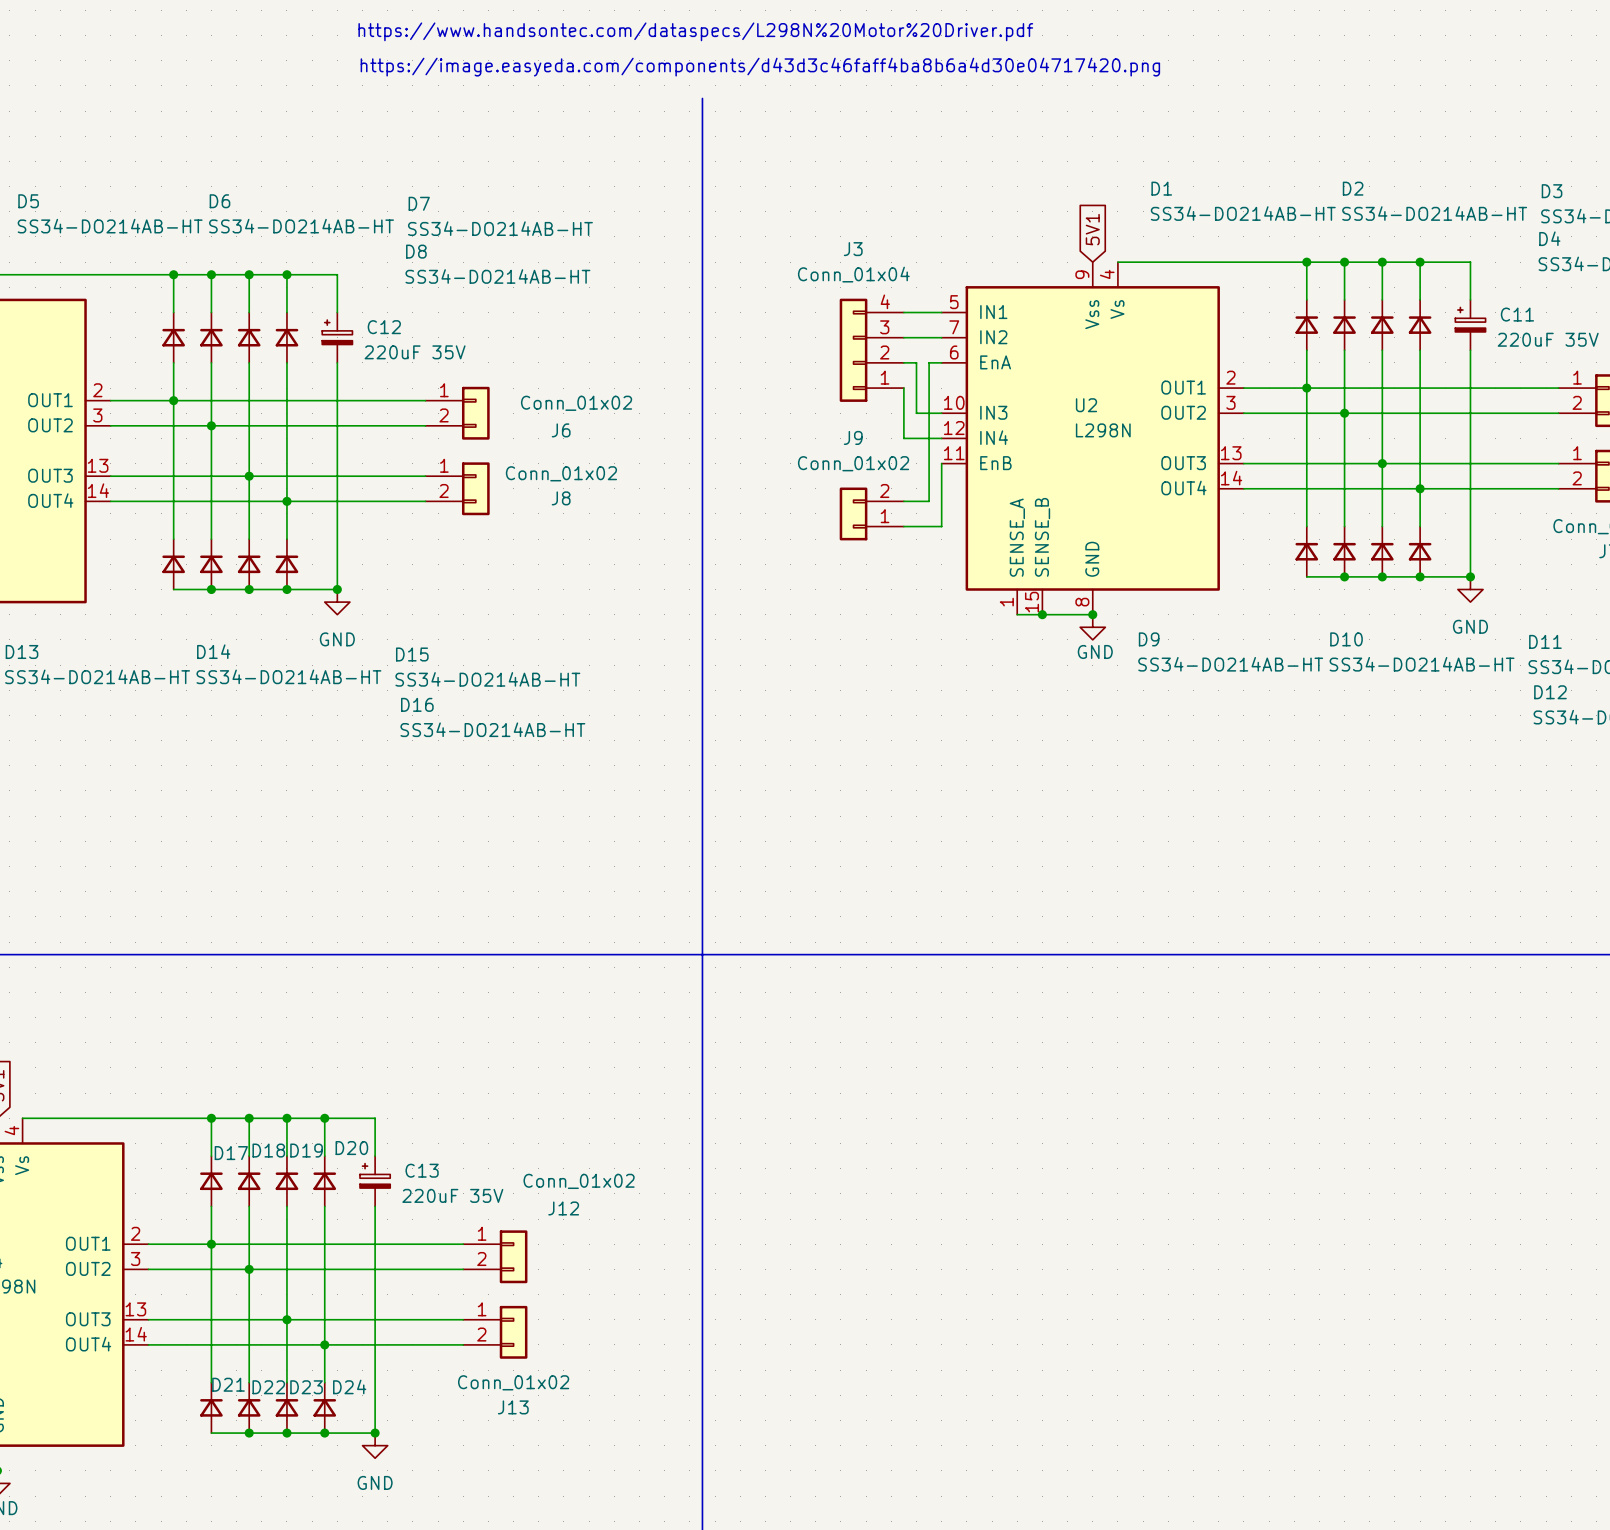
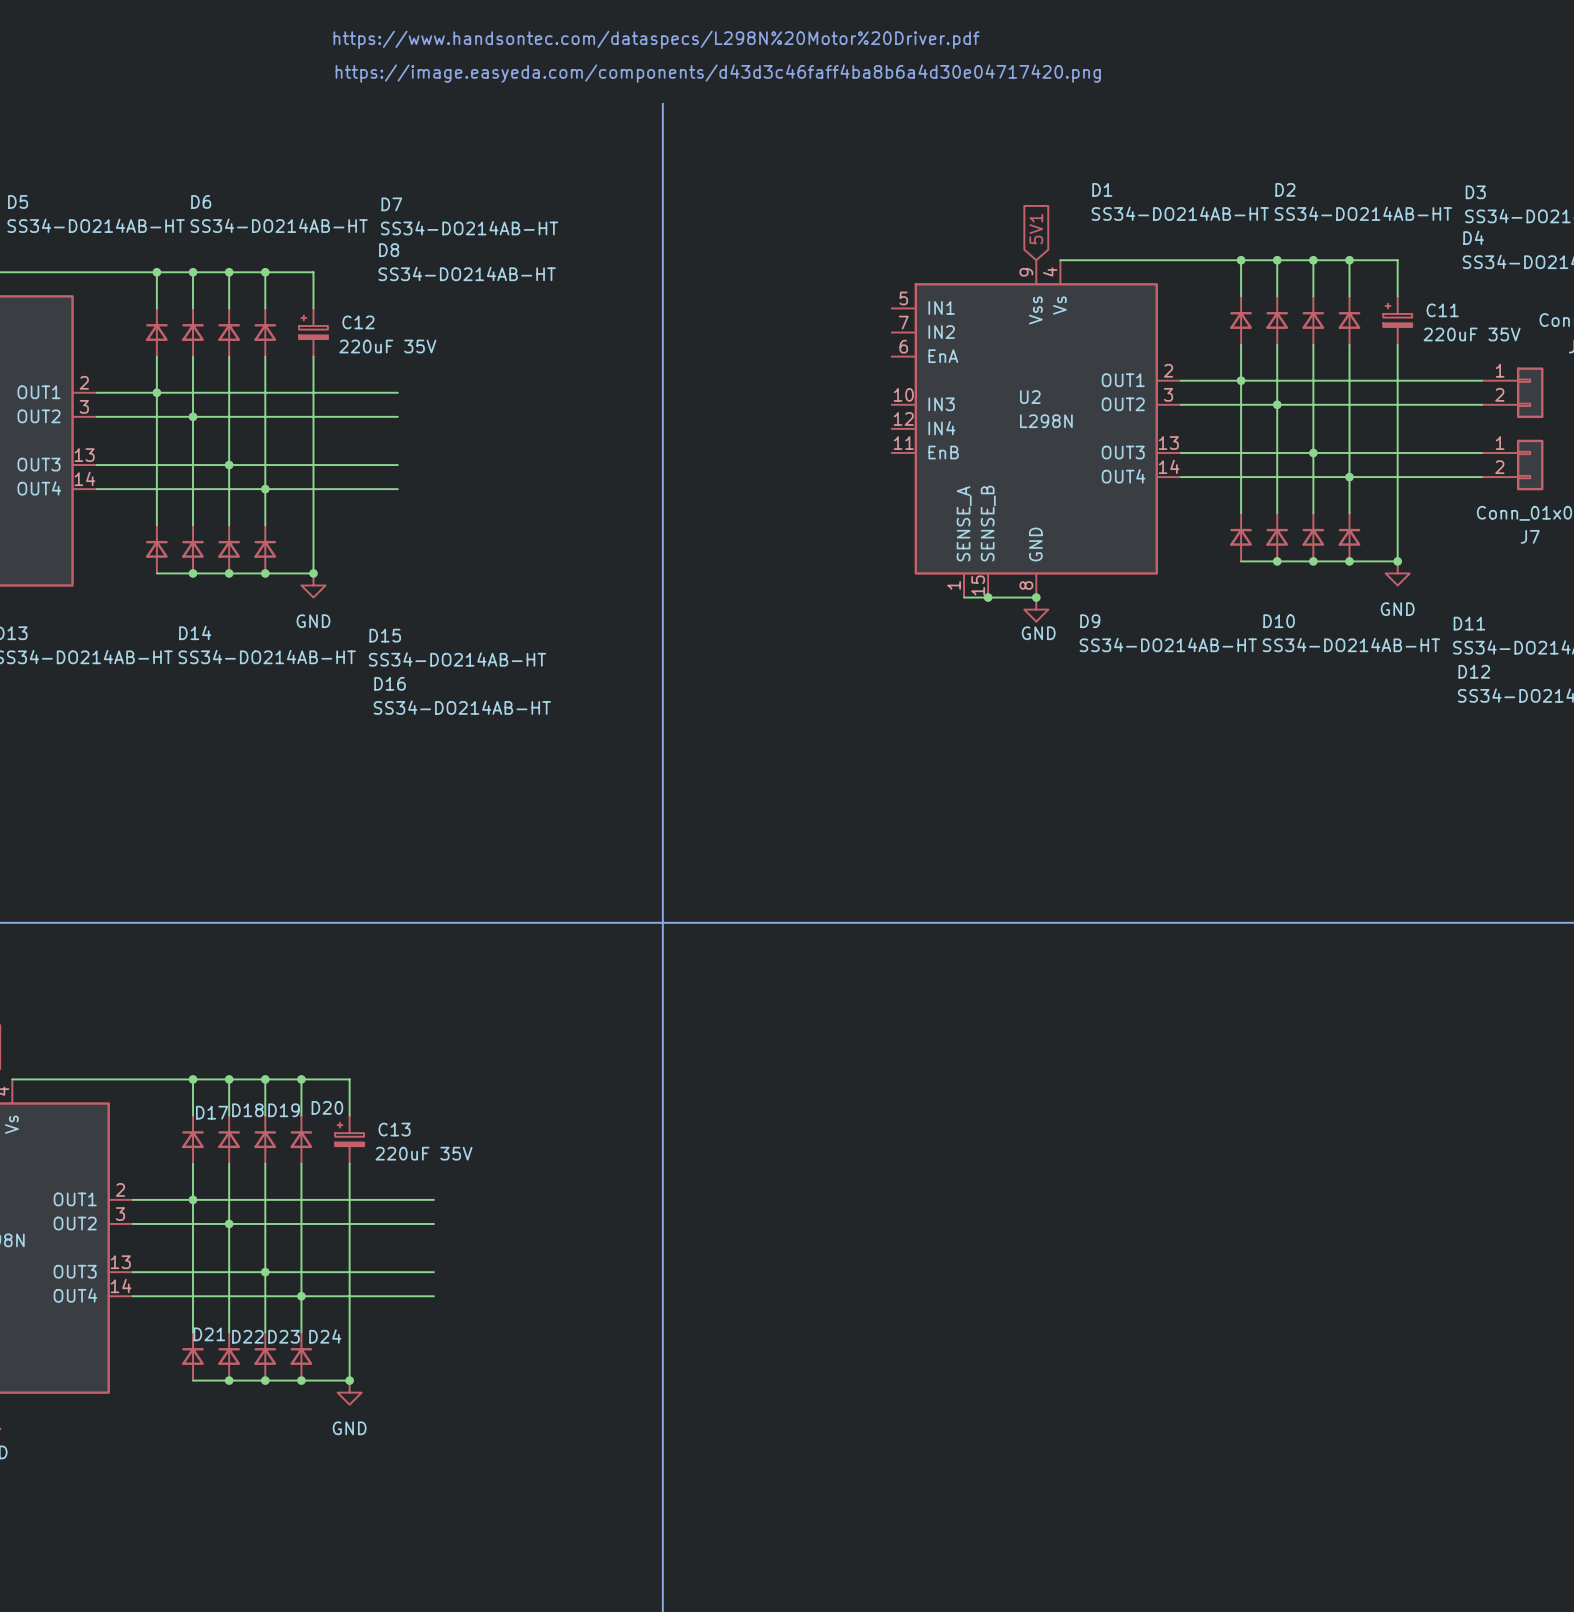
wire: (903, 312) (941, 312) -> none
wire: (903, 337) (941, 337) -> none
J3: Conn_01x04 (871, 350) -> none
wire: (903, 362) (916, 362) (916, 413) (941, 413) -> none
wire: (941, 362) (929, 362) (929, 501) (903, 501) -> none
wire: (903, 388) (903, 438) (941, 438) -> none
J6: Conn_01x02 (457, 413) -> none
wire: (941, 463) (941, 526) (903, 526) -> none
J8: Conn_01x02 (457, 488) -> none
J9: Conn_01x02 (871, 513) -> none
J12: Conn_01x02 (495, 1256) -> none
J13: Conn_01x02 (495, 1332) -> none

